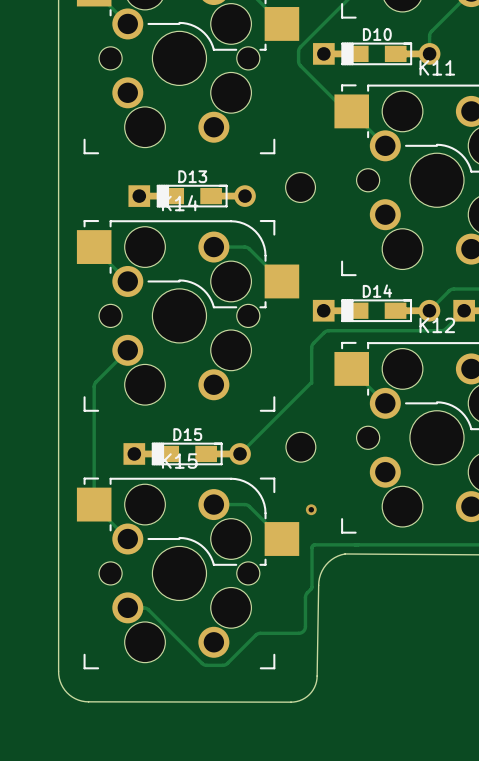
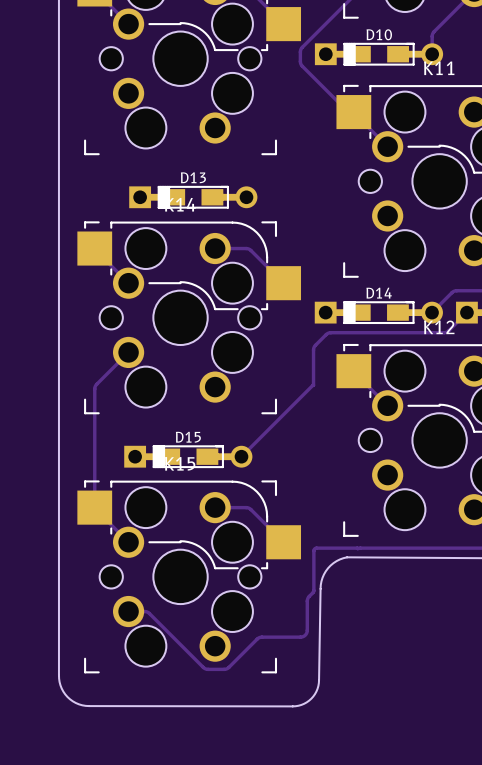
part: (300, 187) -> none
part: (300, 447) -> none
via: (311, 509) -> none

